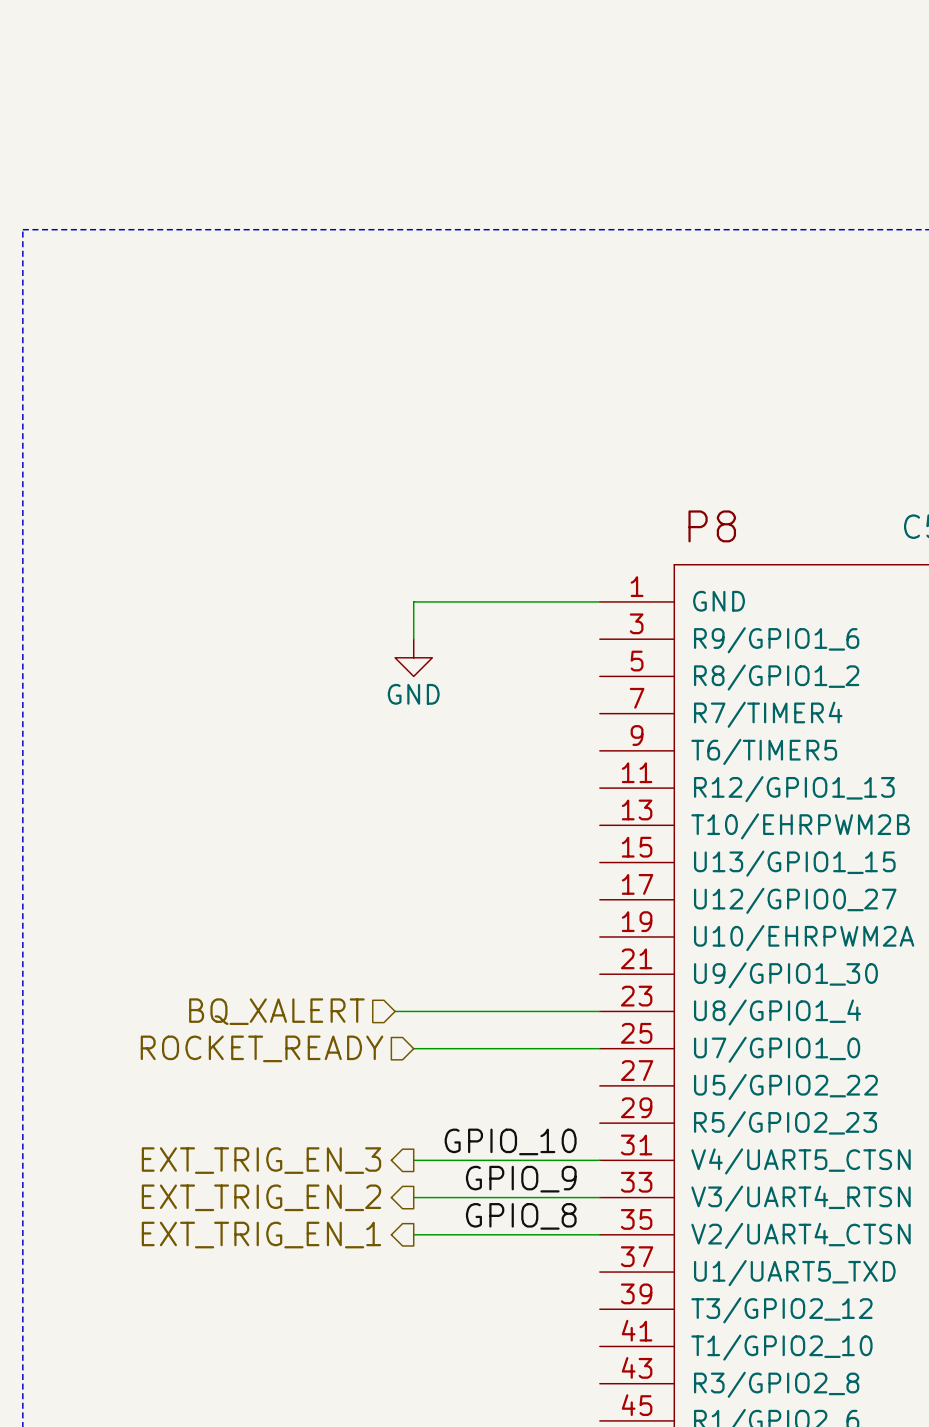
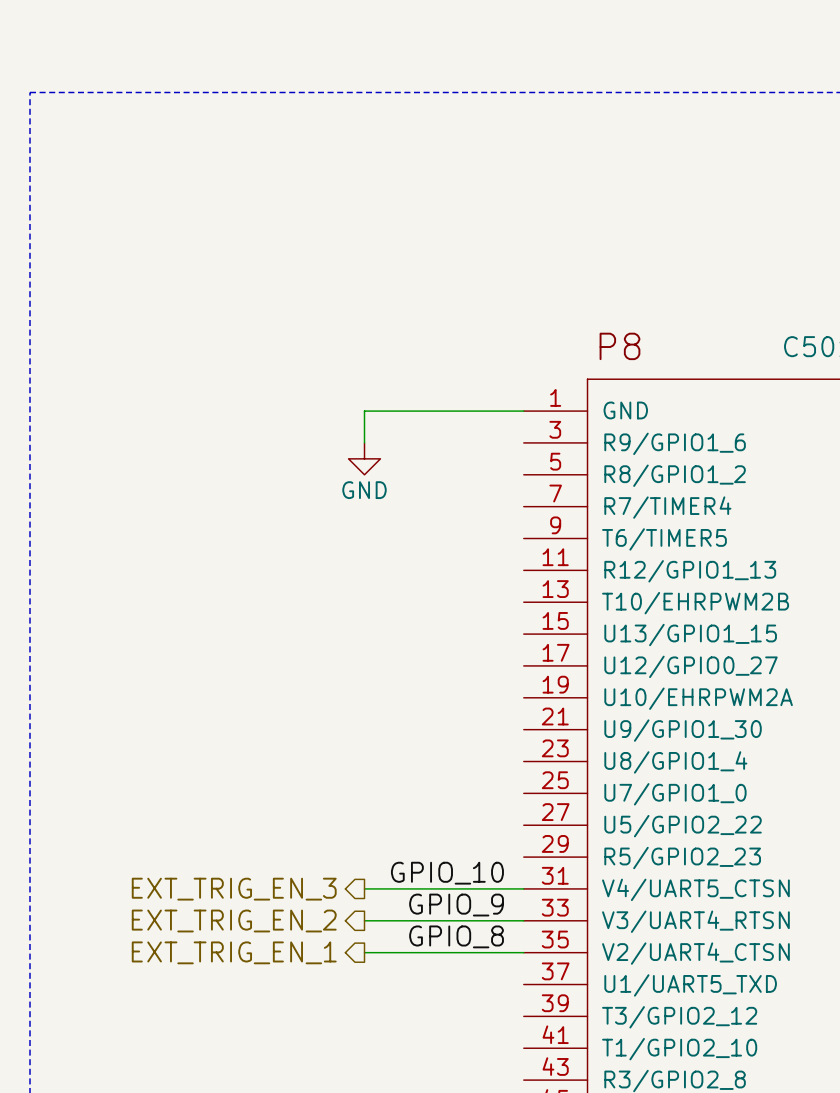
hierarchical label: BQ_XALERT (276, 1011) -> none
wire: (395, 1011) (599, 1011) -> none
hierarchical label: ROCKET_READY (262, 1048) -> none
wire: (413, 1048) (599, 1048) -> none

